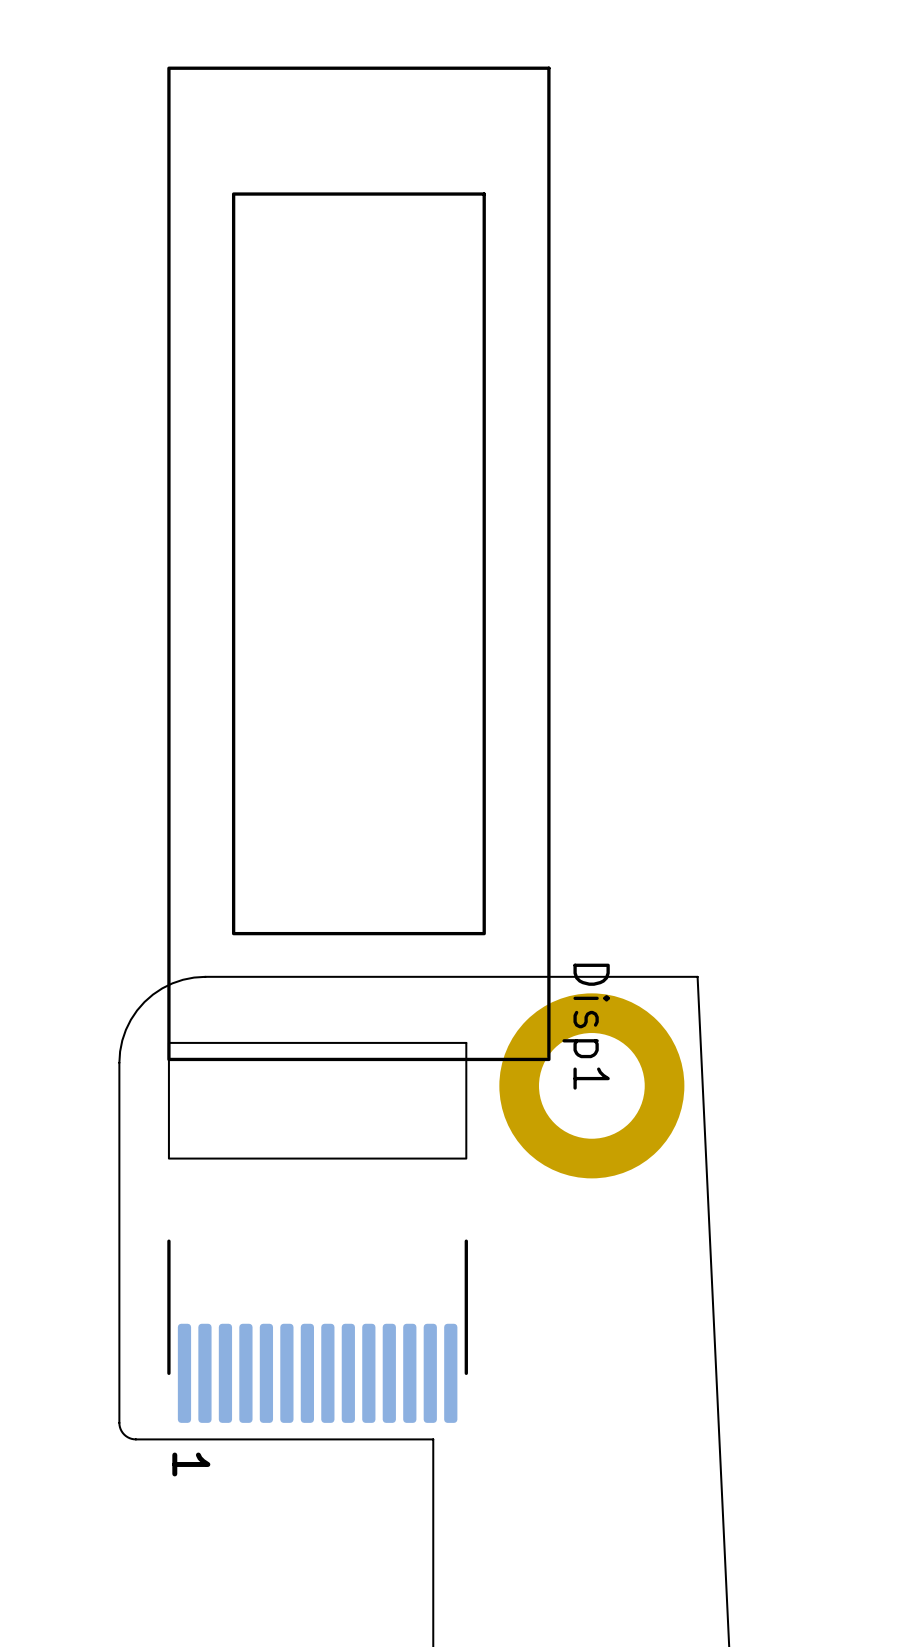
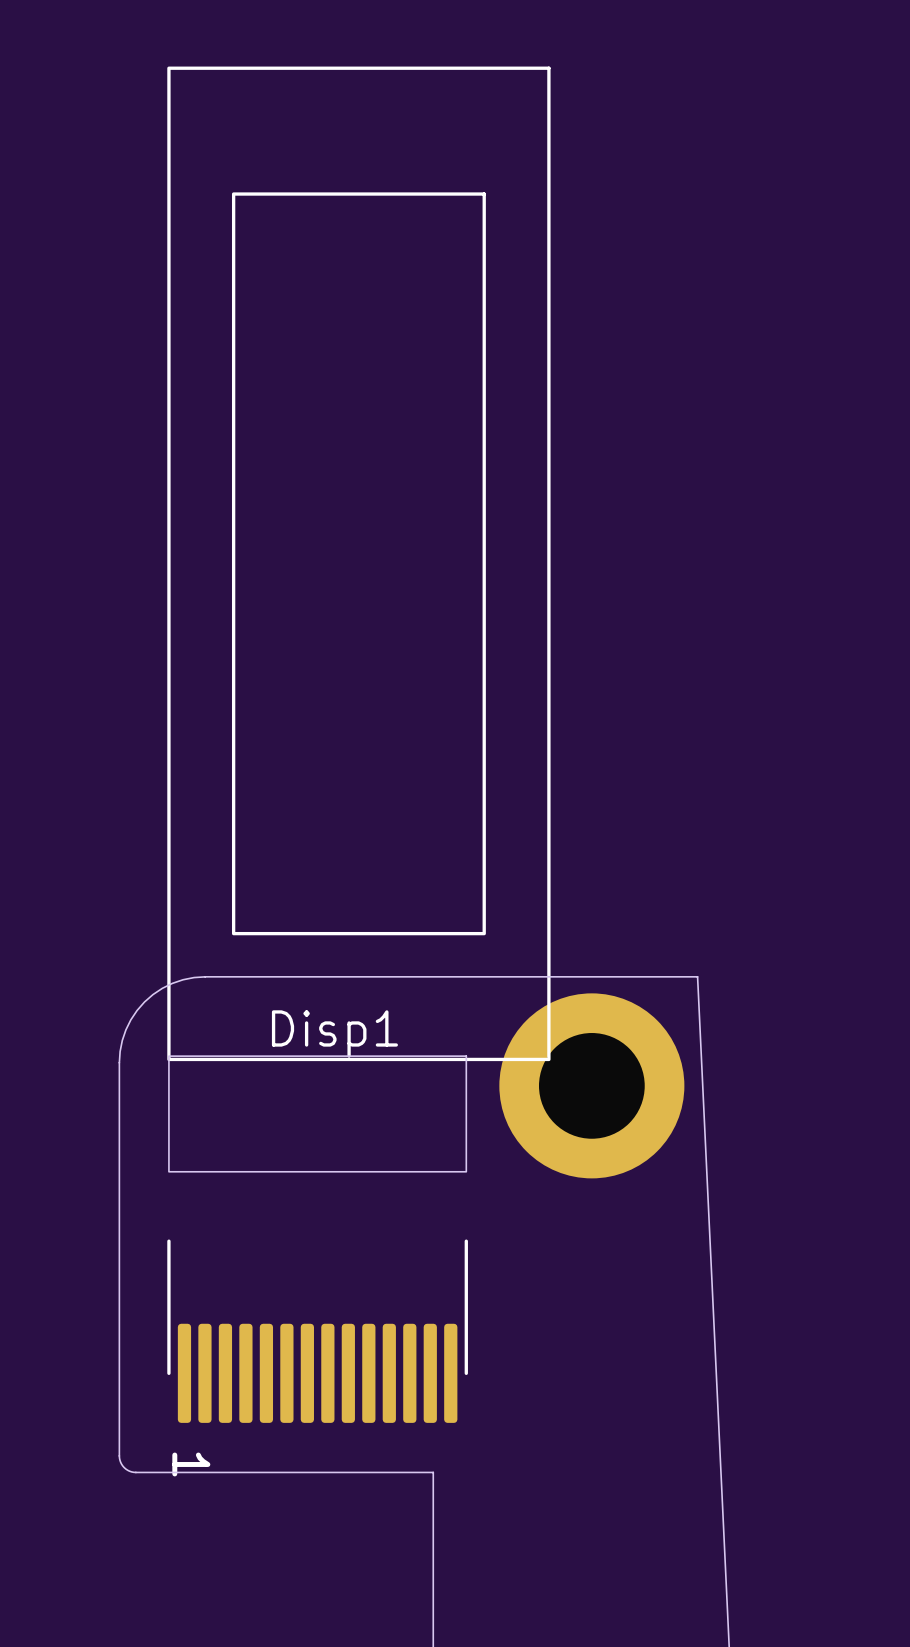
Disp1 footprint: [167, 66, 551, 1423] -> [167, 66, 551, 1423]
Disp1 name rotation: 0° (586, 1026) -> 90° counterclockwise (334, 1033)
Disp1 name position: Disp1 (586, 1026) -> Disp1 (334, 1033)
board edge: (119, 1422) (124, 1434) (135, 1439) (433, 1439) (433, 1472) -> (119, 1422) (119, 1460) (125, 1469) (133, 1472) (433, 1472)

